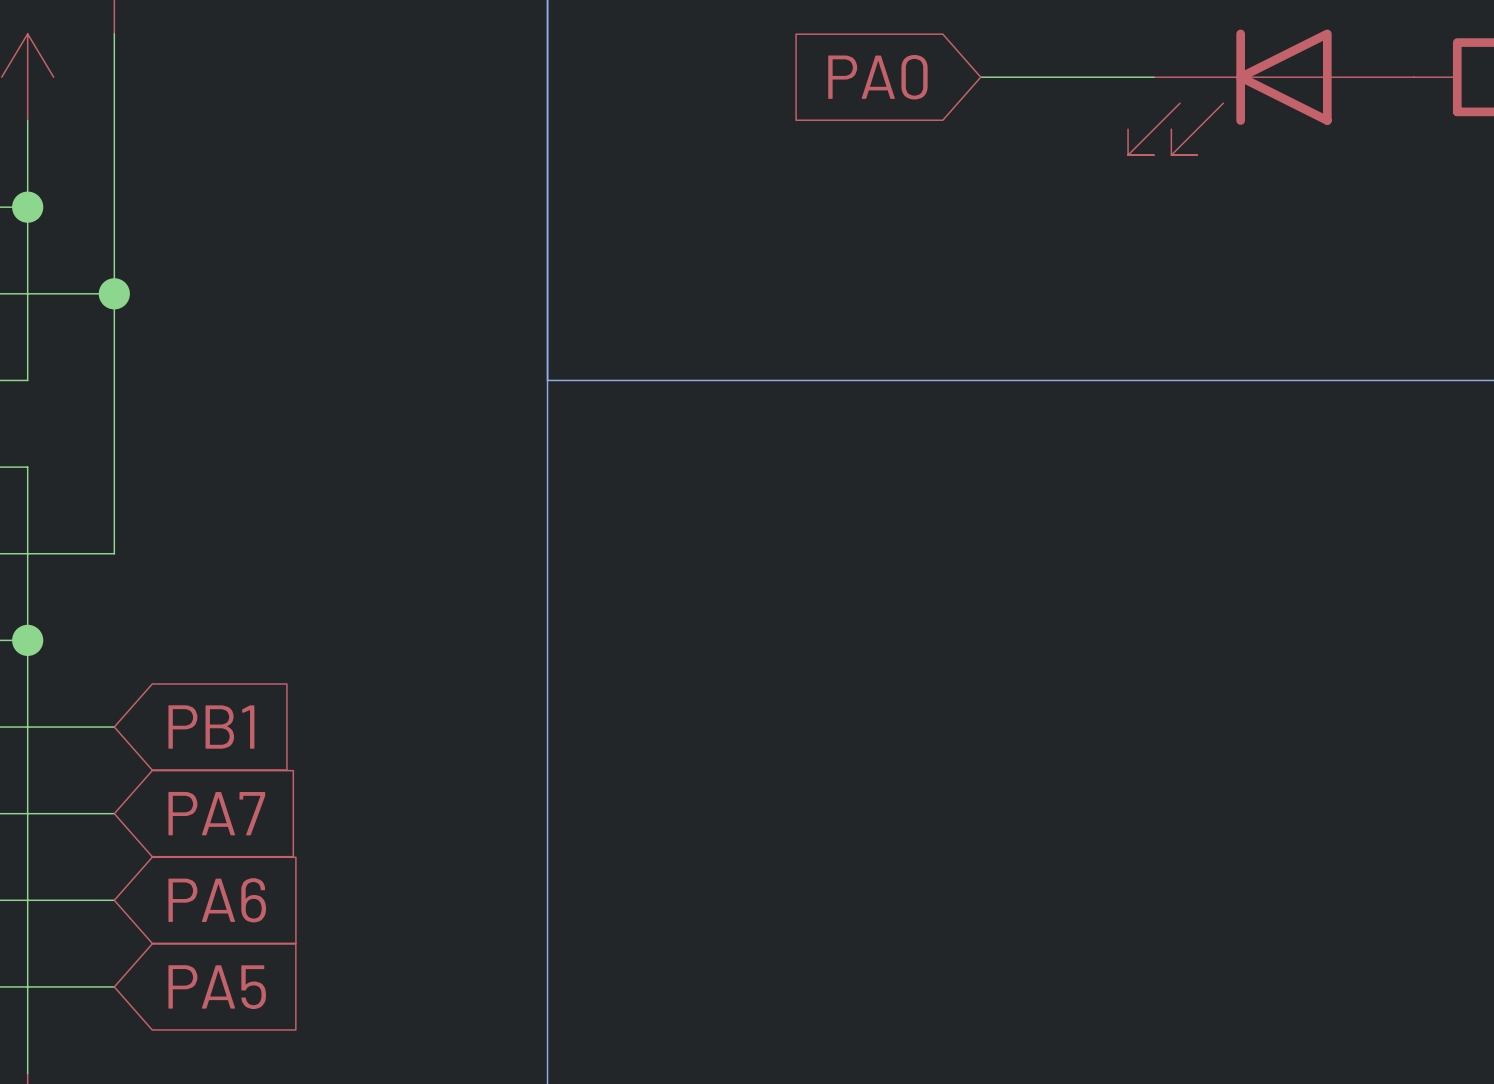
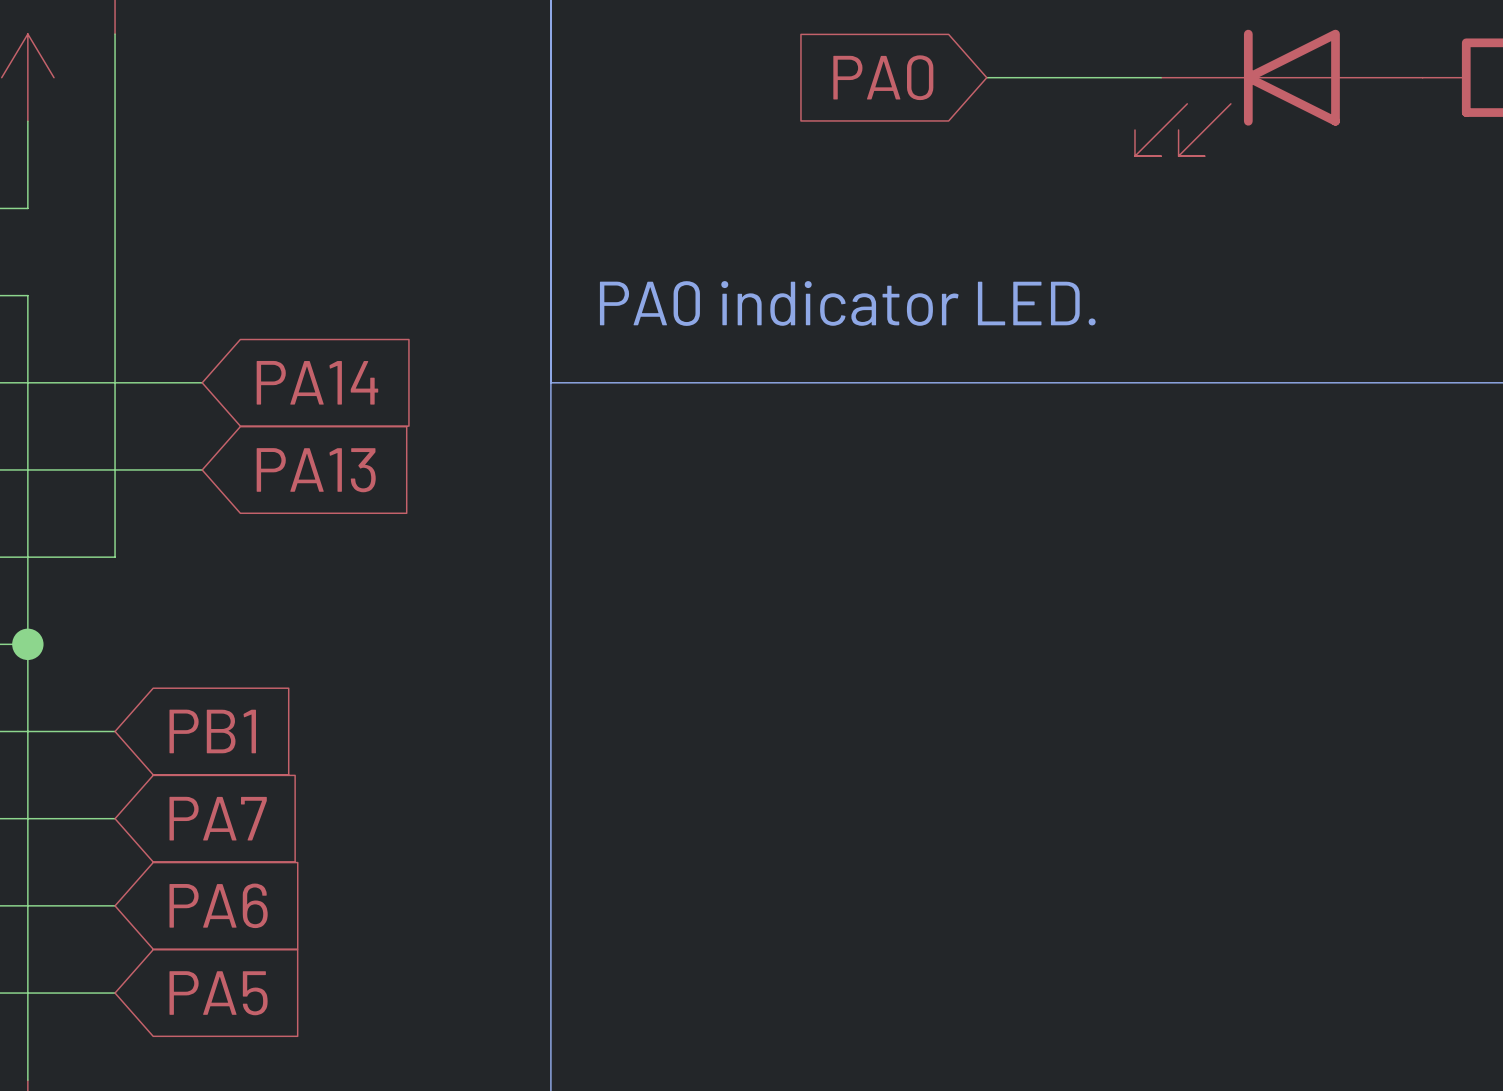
wire: (27, 207) (27, 293) (114, 293) -> none
junction: (27, 207) -> none
junction: (114, 293) -> none
text: none -> PA0 indicator LED. (847, 303)
wire: none -> (202, 382) (27, 382) (27, 469) (202, 469)
global label: none -> PA14 (317, 382)
global label: none -> PA13 (316, 470)

